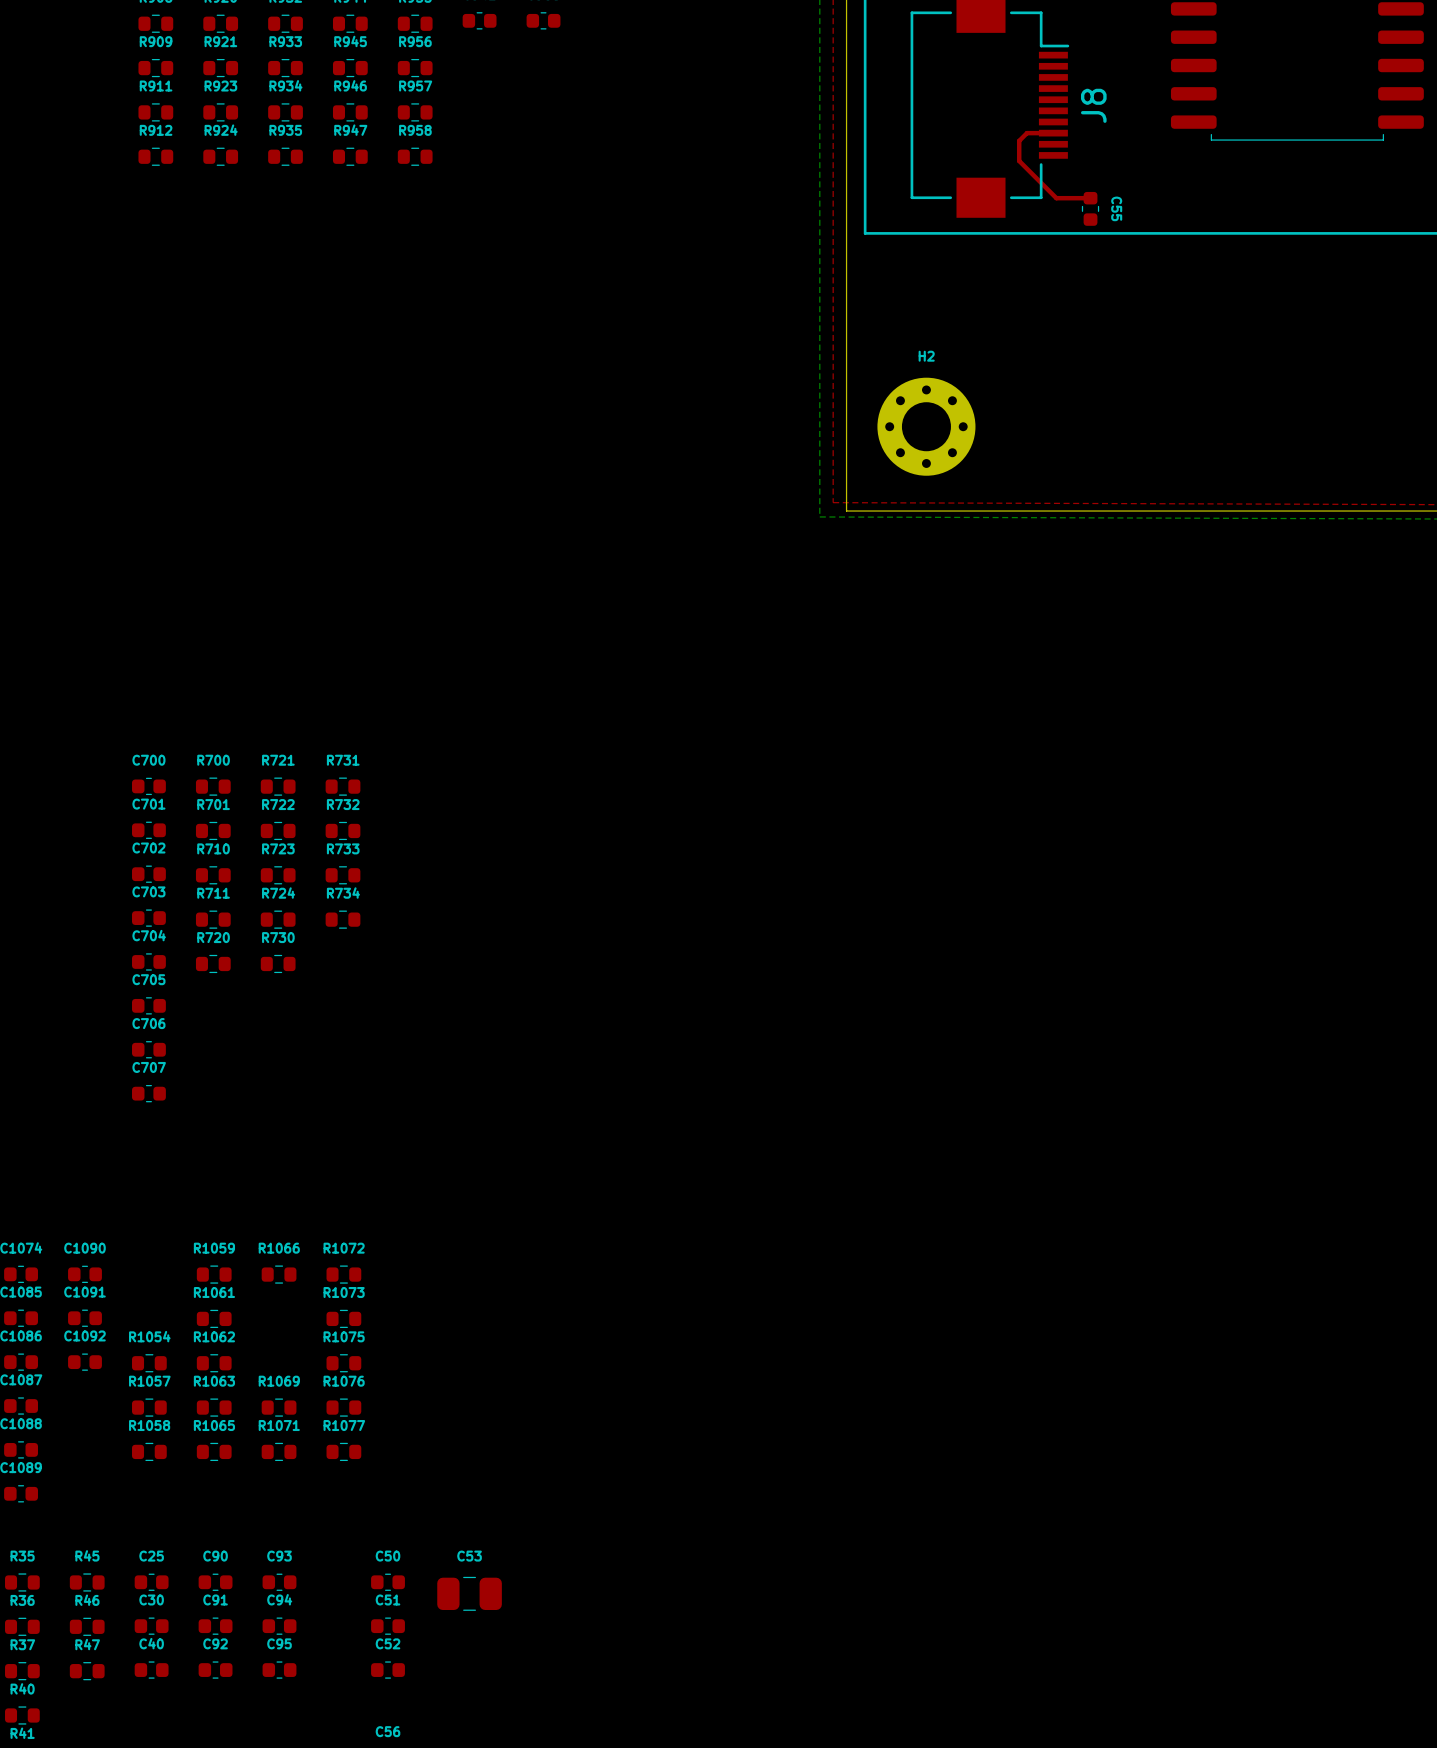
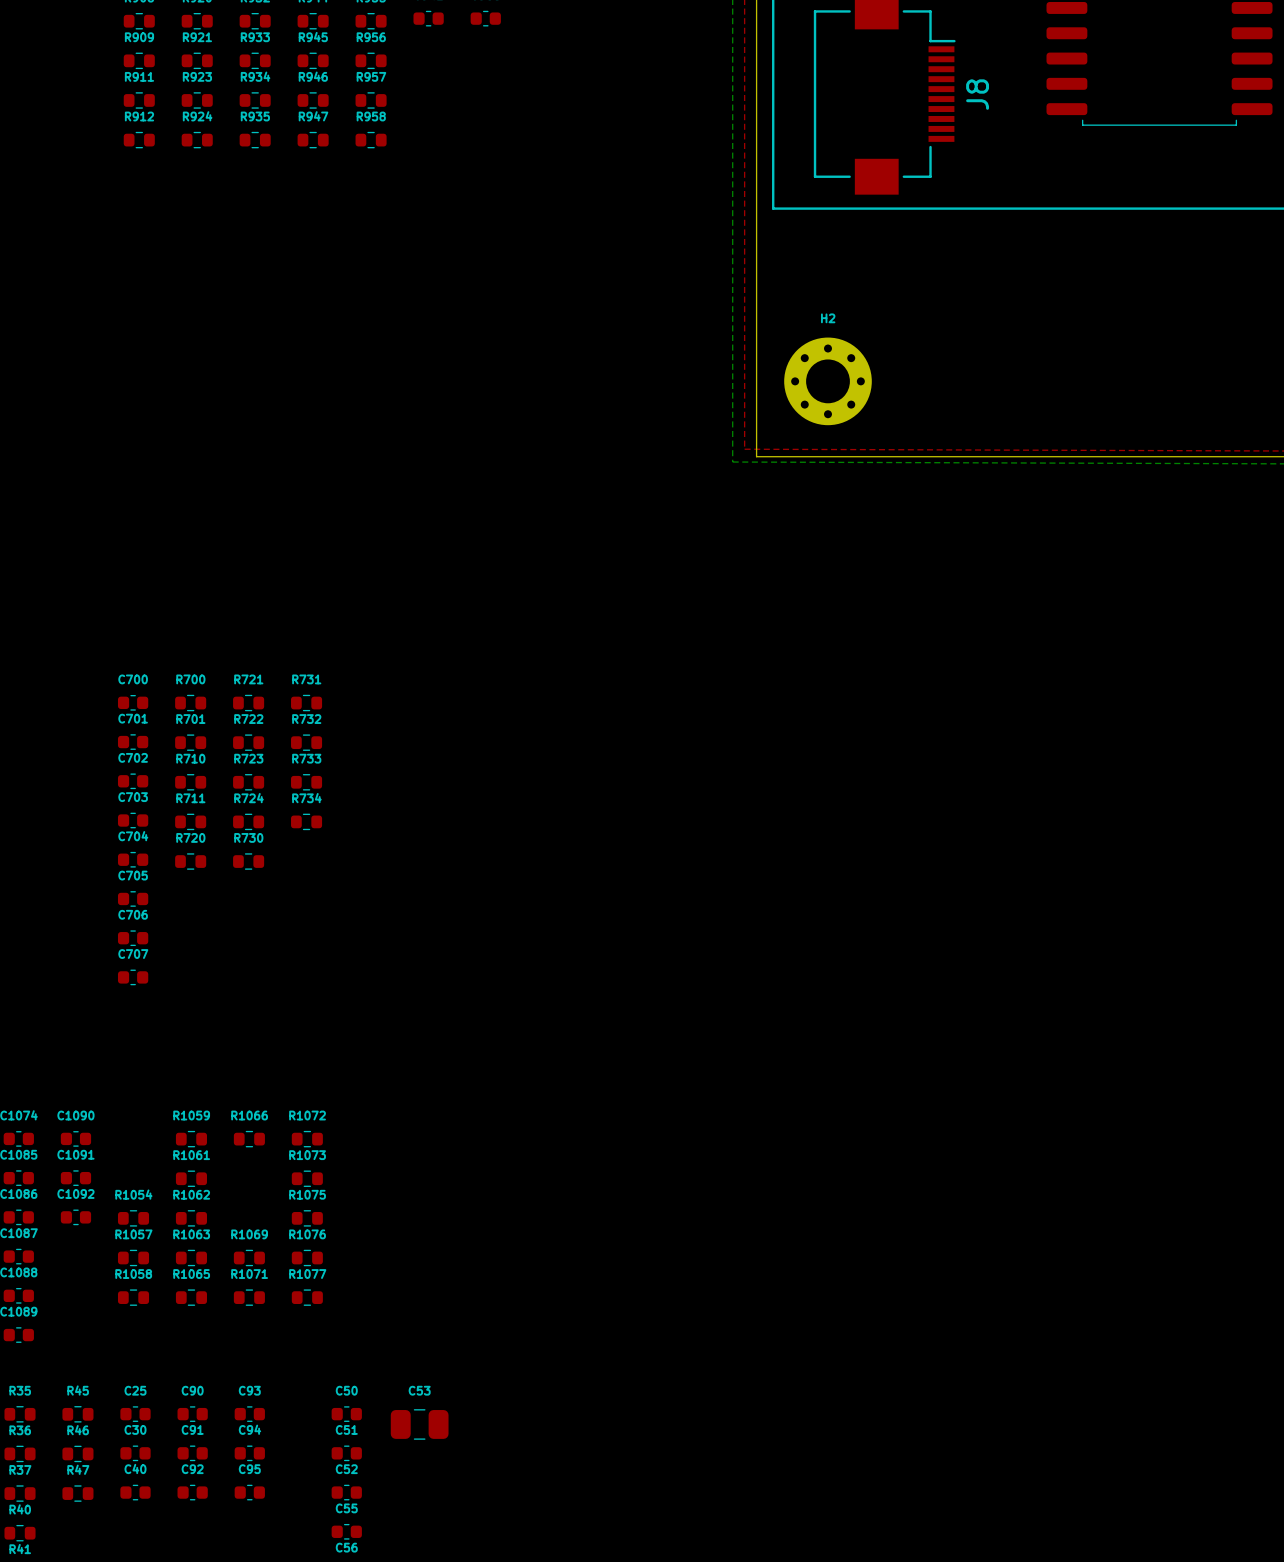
top track: (1053, 133) (1027, 133) (1019, 140) (1019, 160) (1056, 198) (1090, 198) -> none
C55 rotation: 0° (1090, 208) -> 90° clockwise (346, 1531)
C55 position: (1090, 208) -> (346, 1531)

